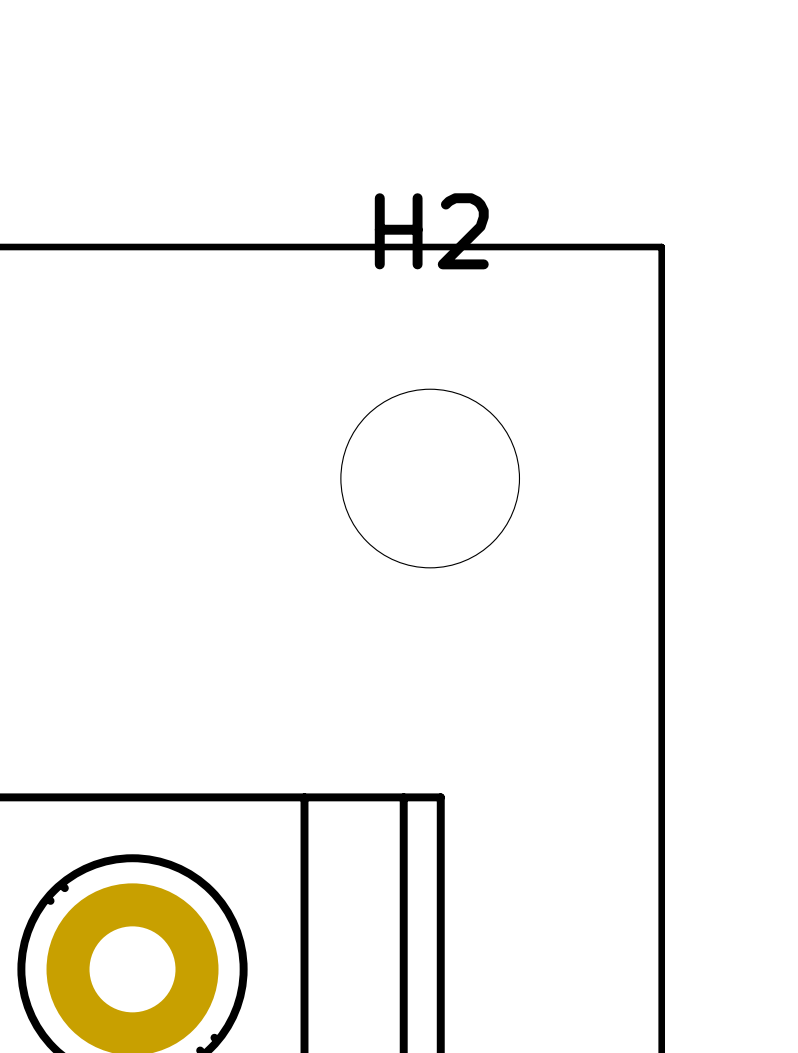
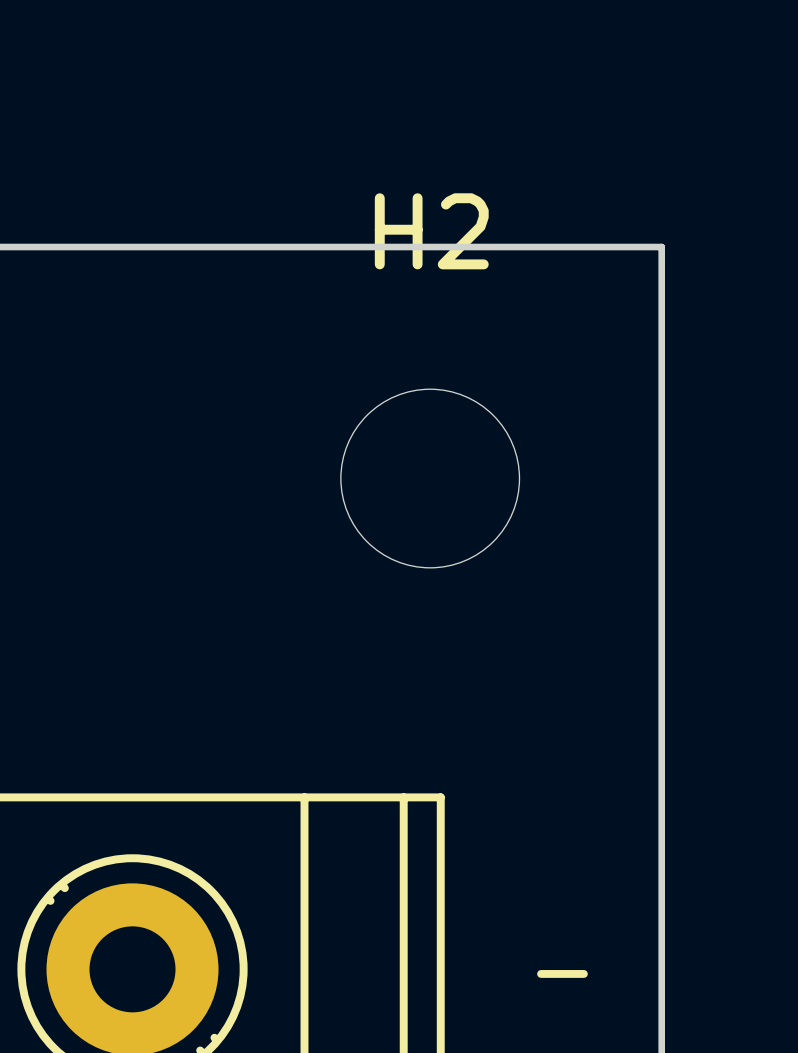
text: none -> - (562, 973)

